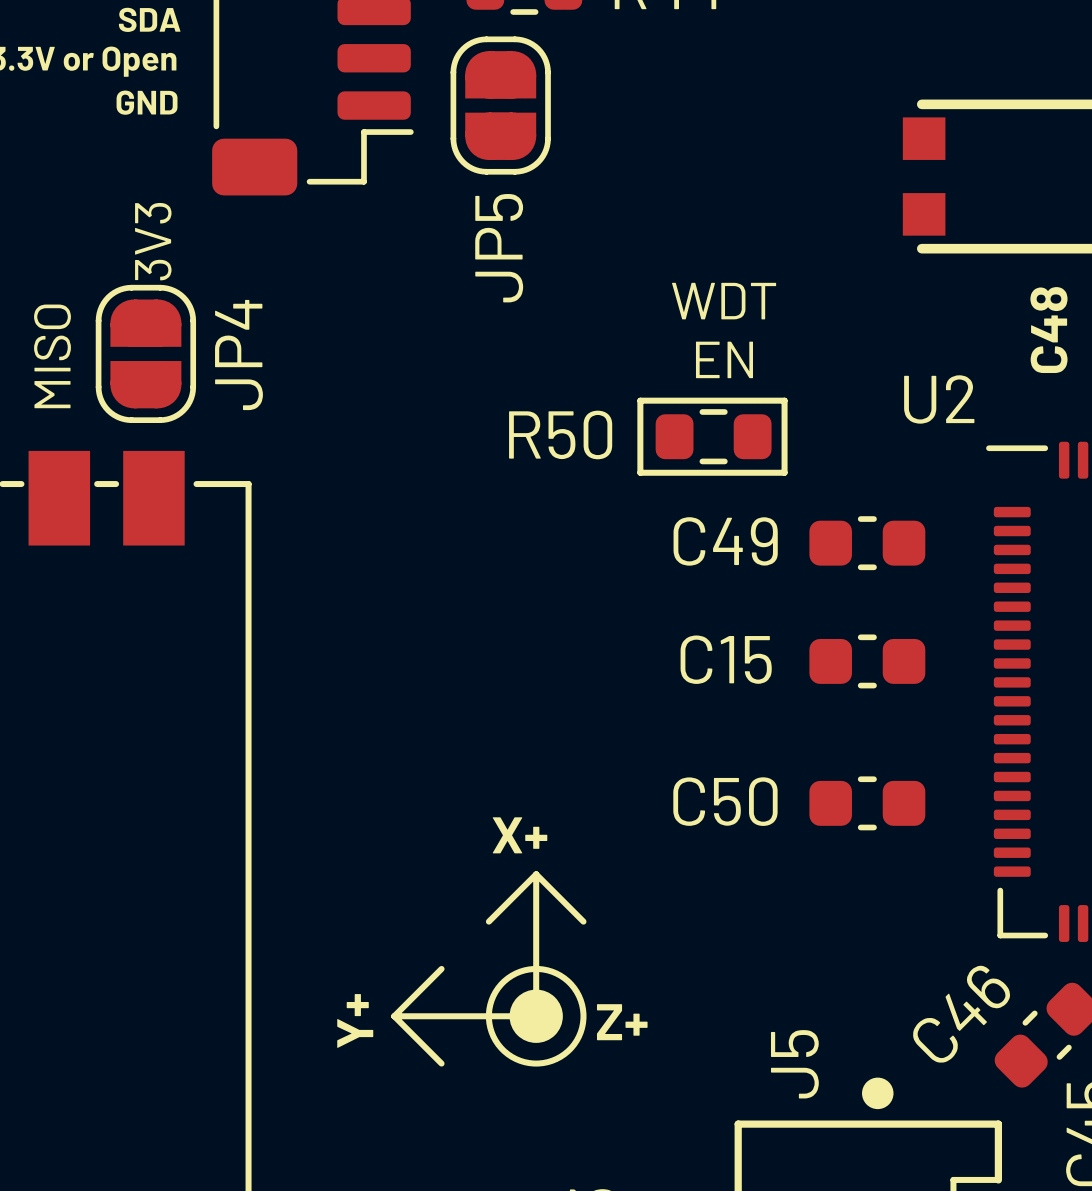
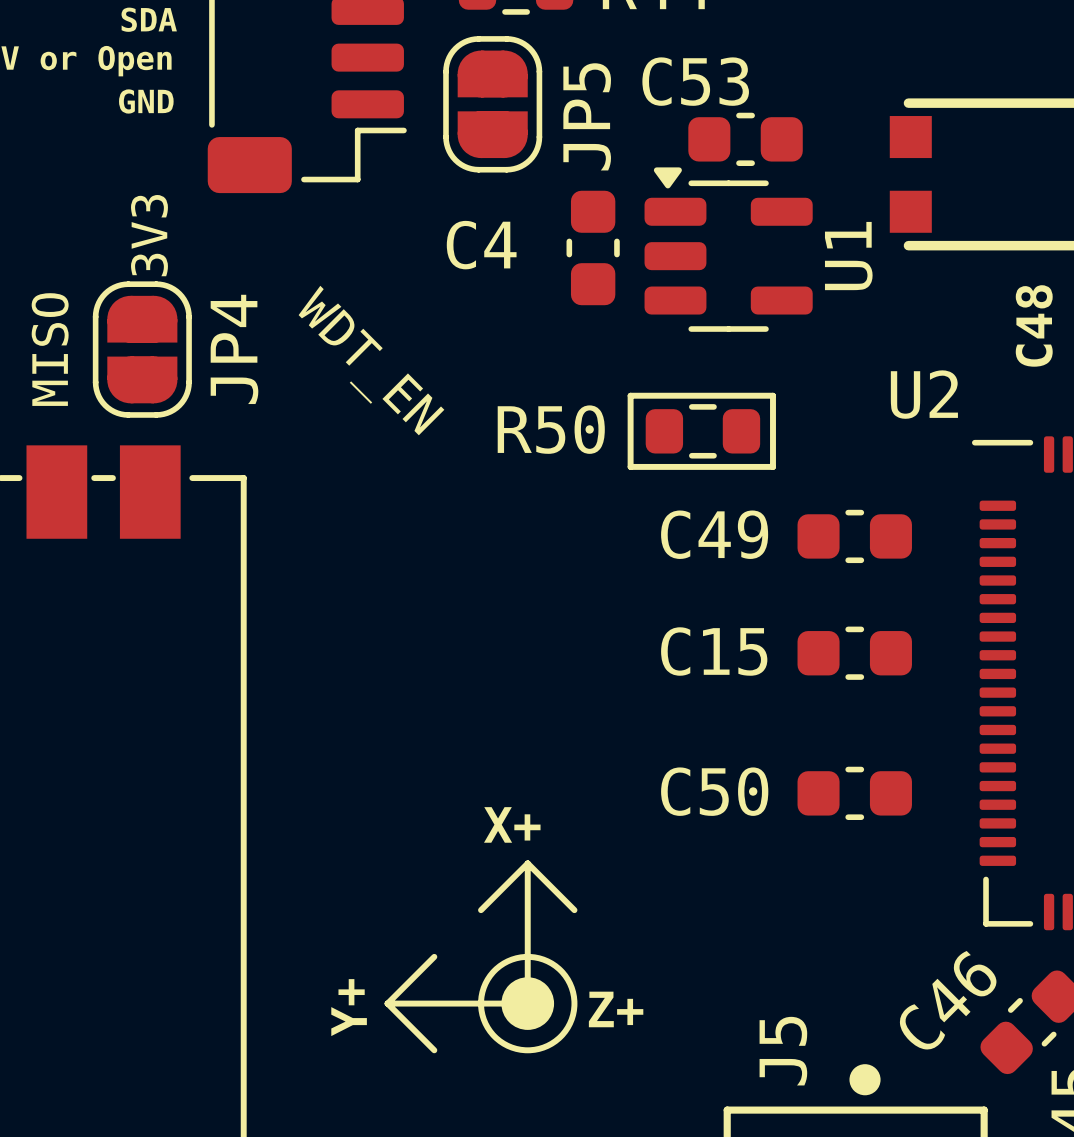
C53: none -> (745, 139)
JP5 name position: JP5 (499, 248) -> JP5 (587, 116)
C4: none -> (593, 247)
U1: none -> (728, 249)
text: WDT (724, 301) -> none
text: EN (724, 359) -> none
text: none -> WDT_EN (371, 360)

